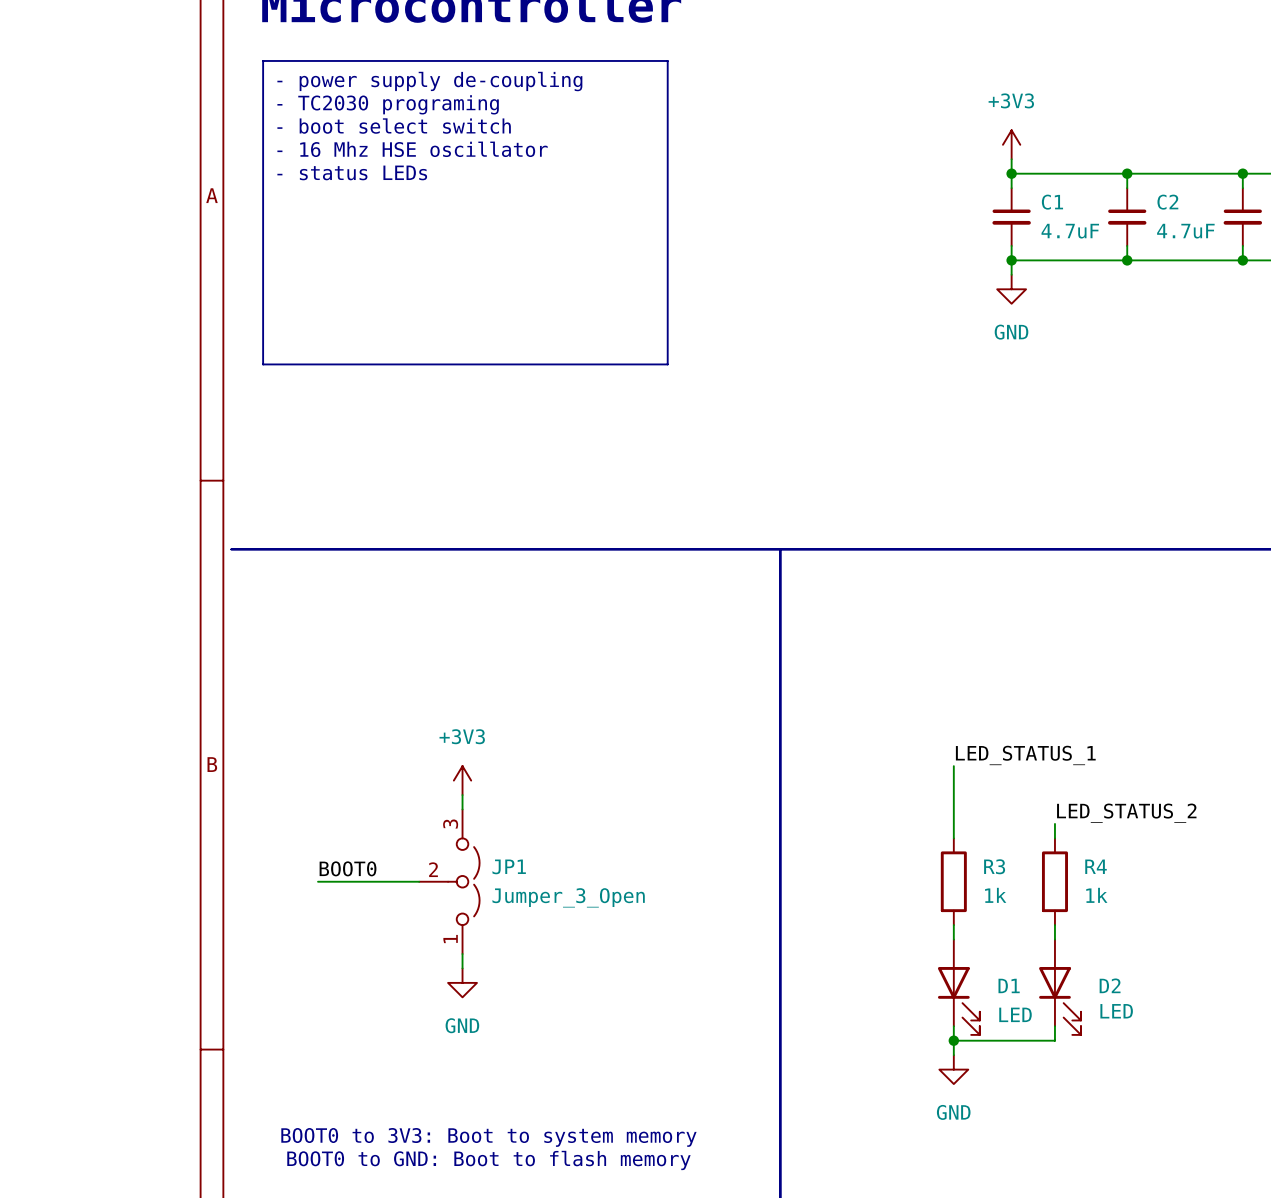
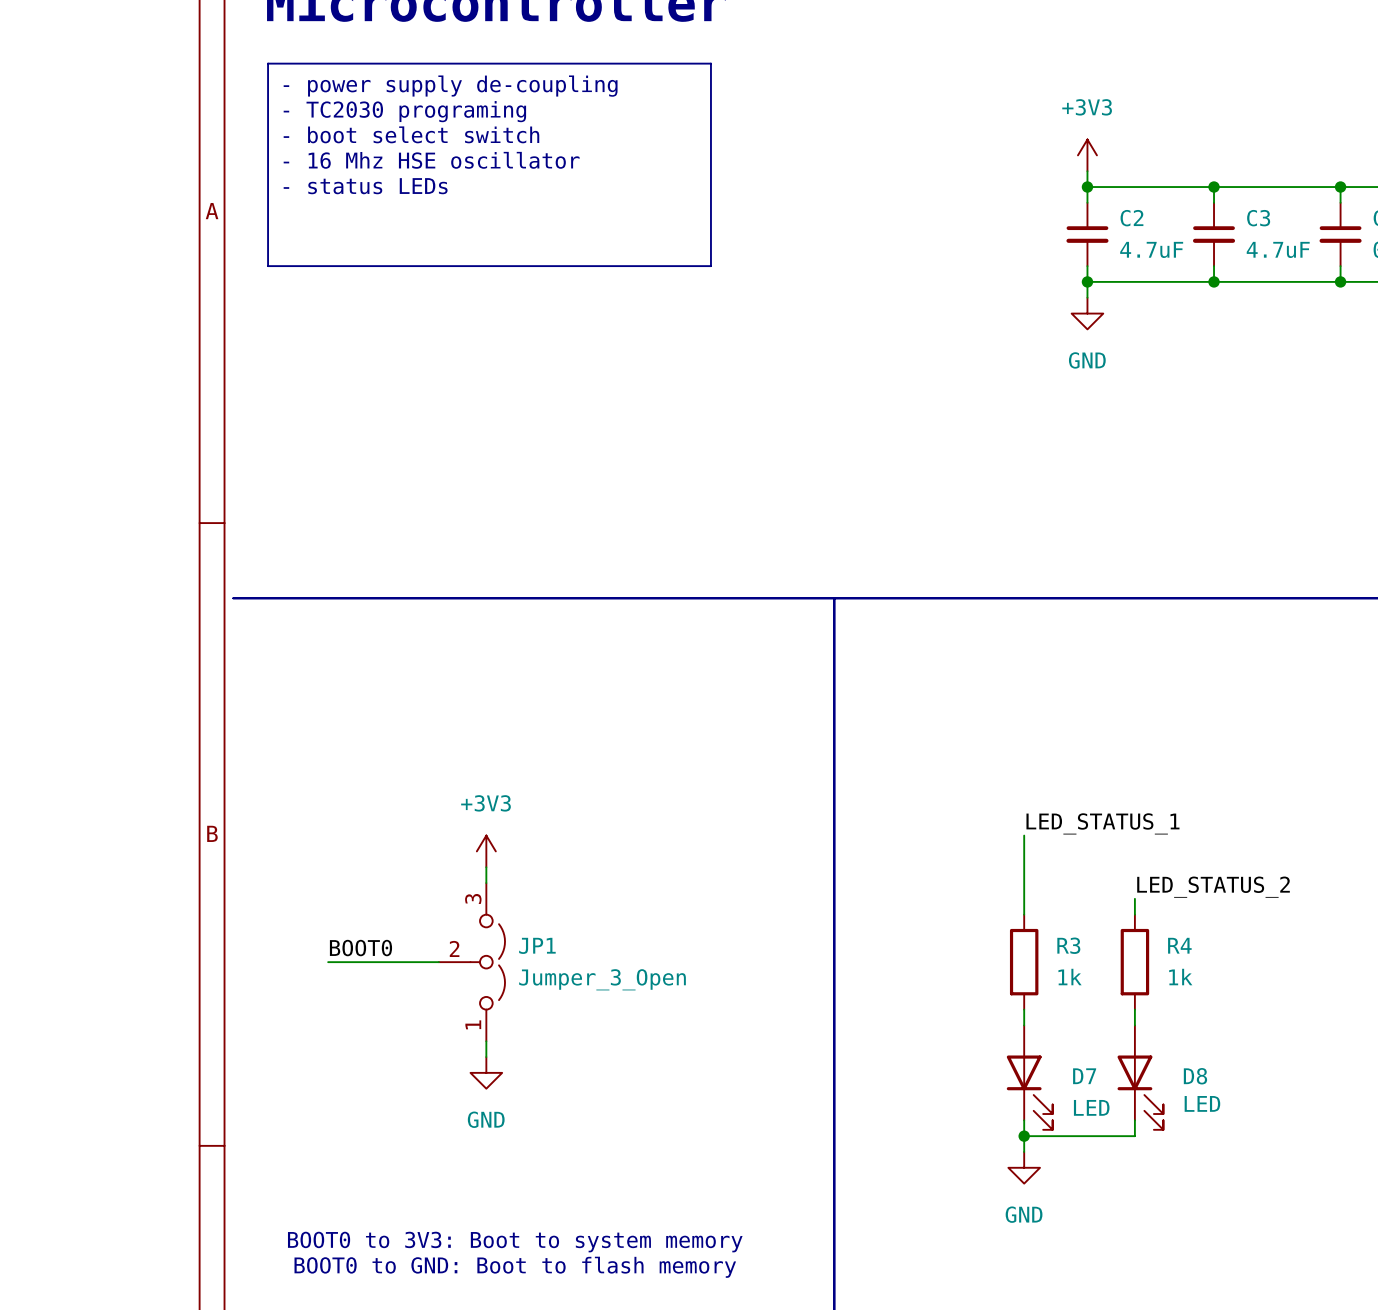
C1 name: C1 (1052, 202) -> C2 (1131, 218)
C2 name: C2 (1167, 202) -> C3 (1258, 218)
line: (263, 245) (263, 364) (667, 364) (667, 245) -> (268, 266) (710, 266)
D1 name: D1 (1009, 985) -> D7 (1084, 1076)
D2 name: D2 (1110, 985) -> D8 (1195, 1076)

